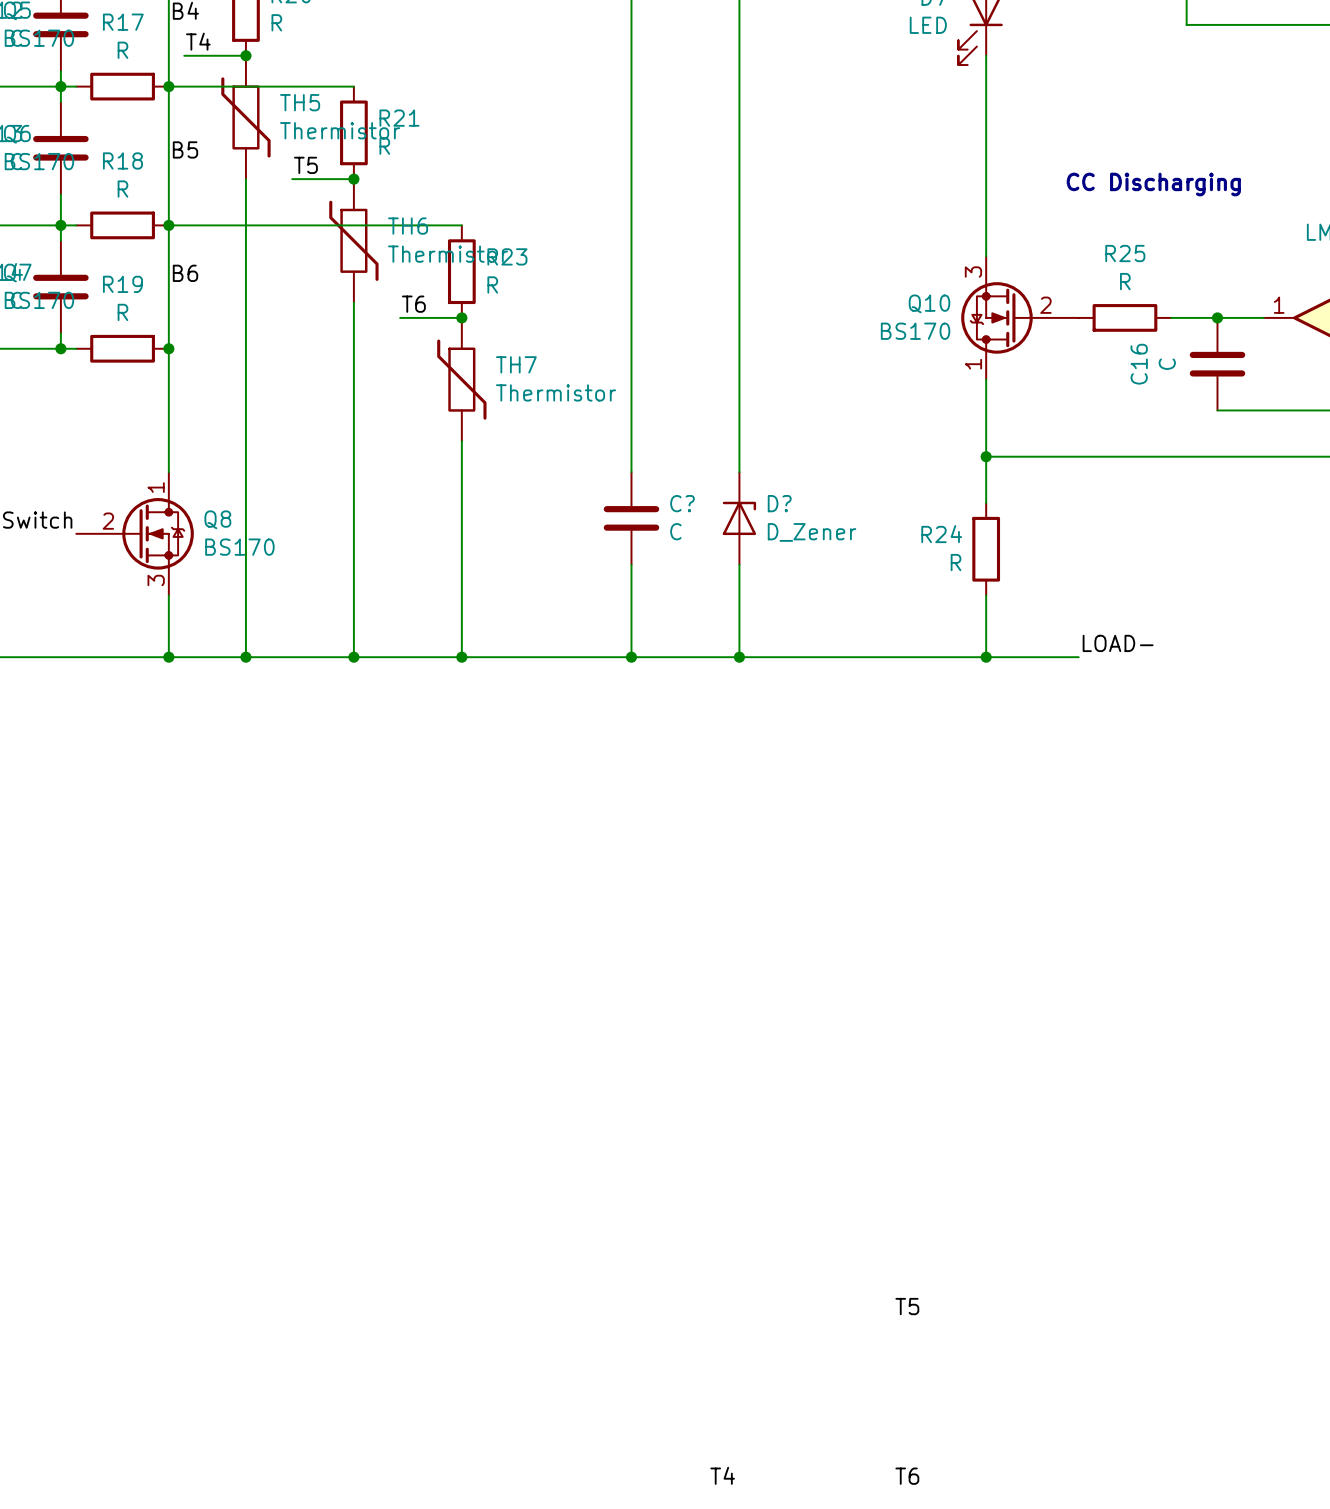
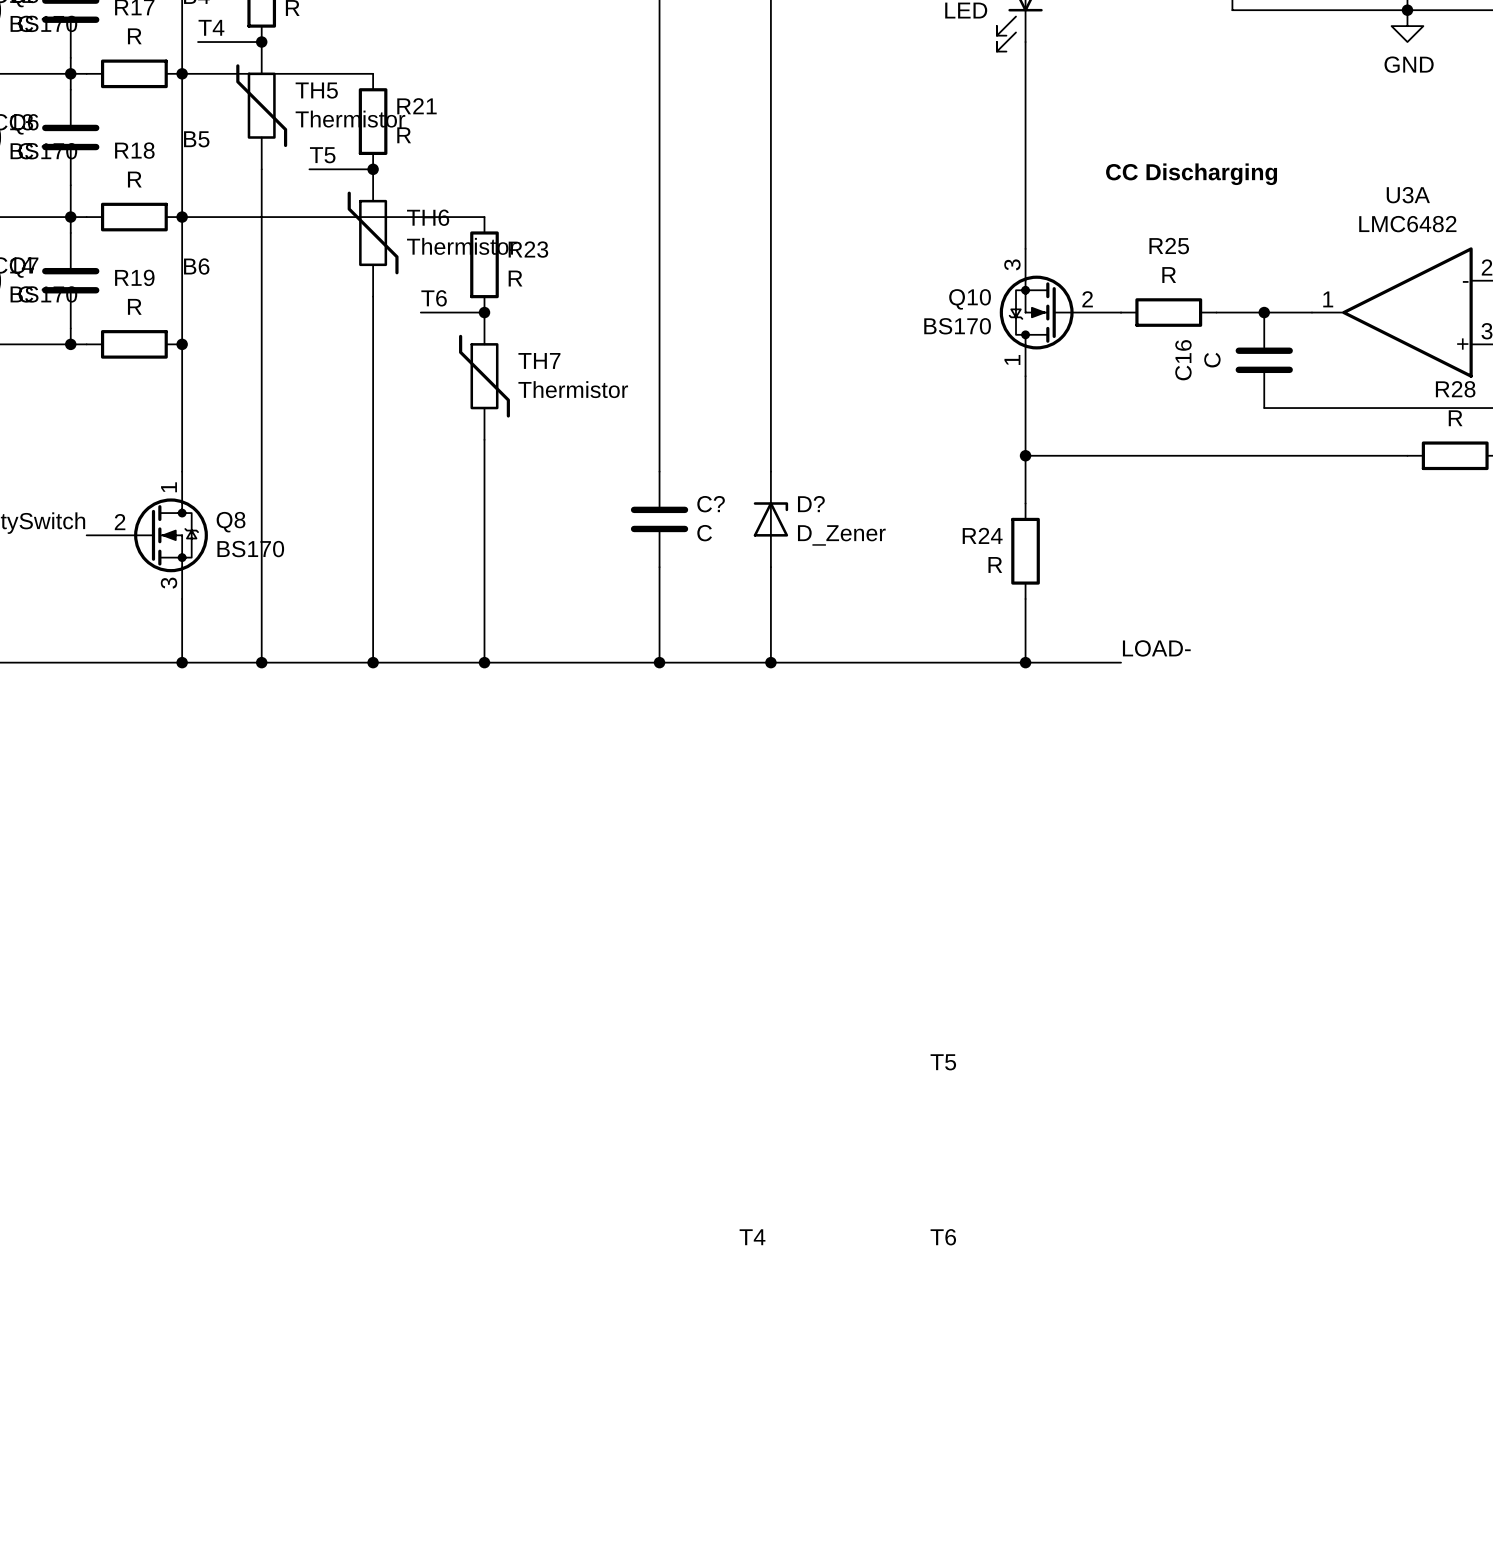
label position: T5 (907, 1306) -> T5 (943, 1062)
label position: T4 (722, 1475) -> T4 (752, 1237)
label position: T6 (907, 1476) -> T6 (943, 1237)

